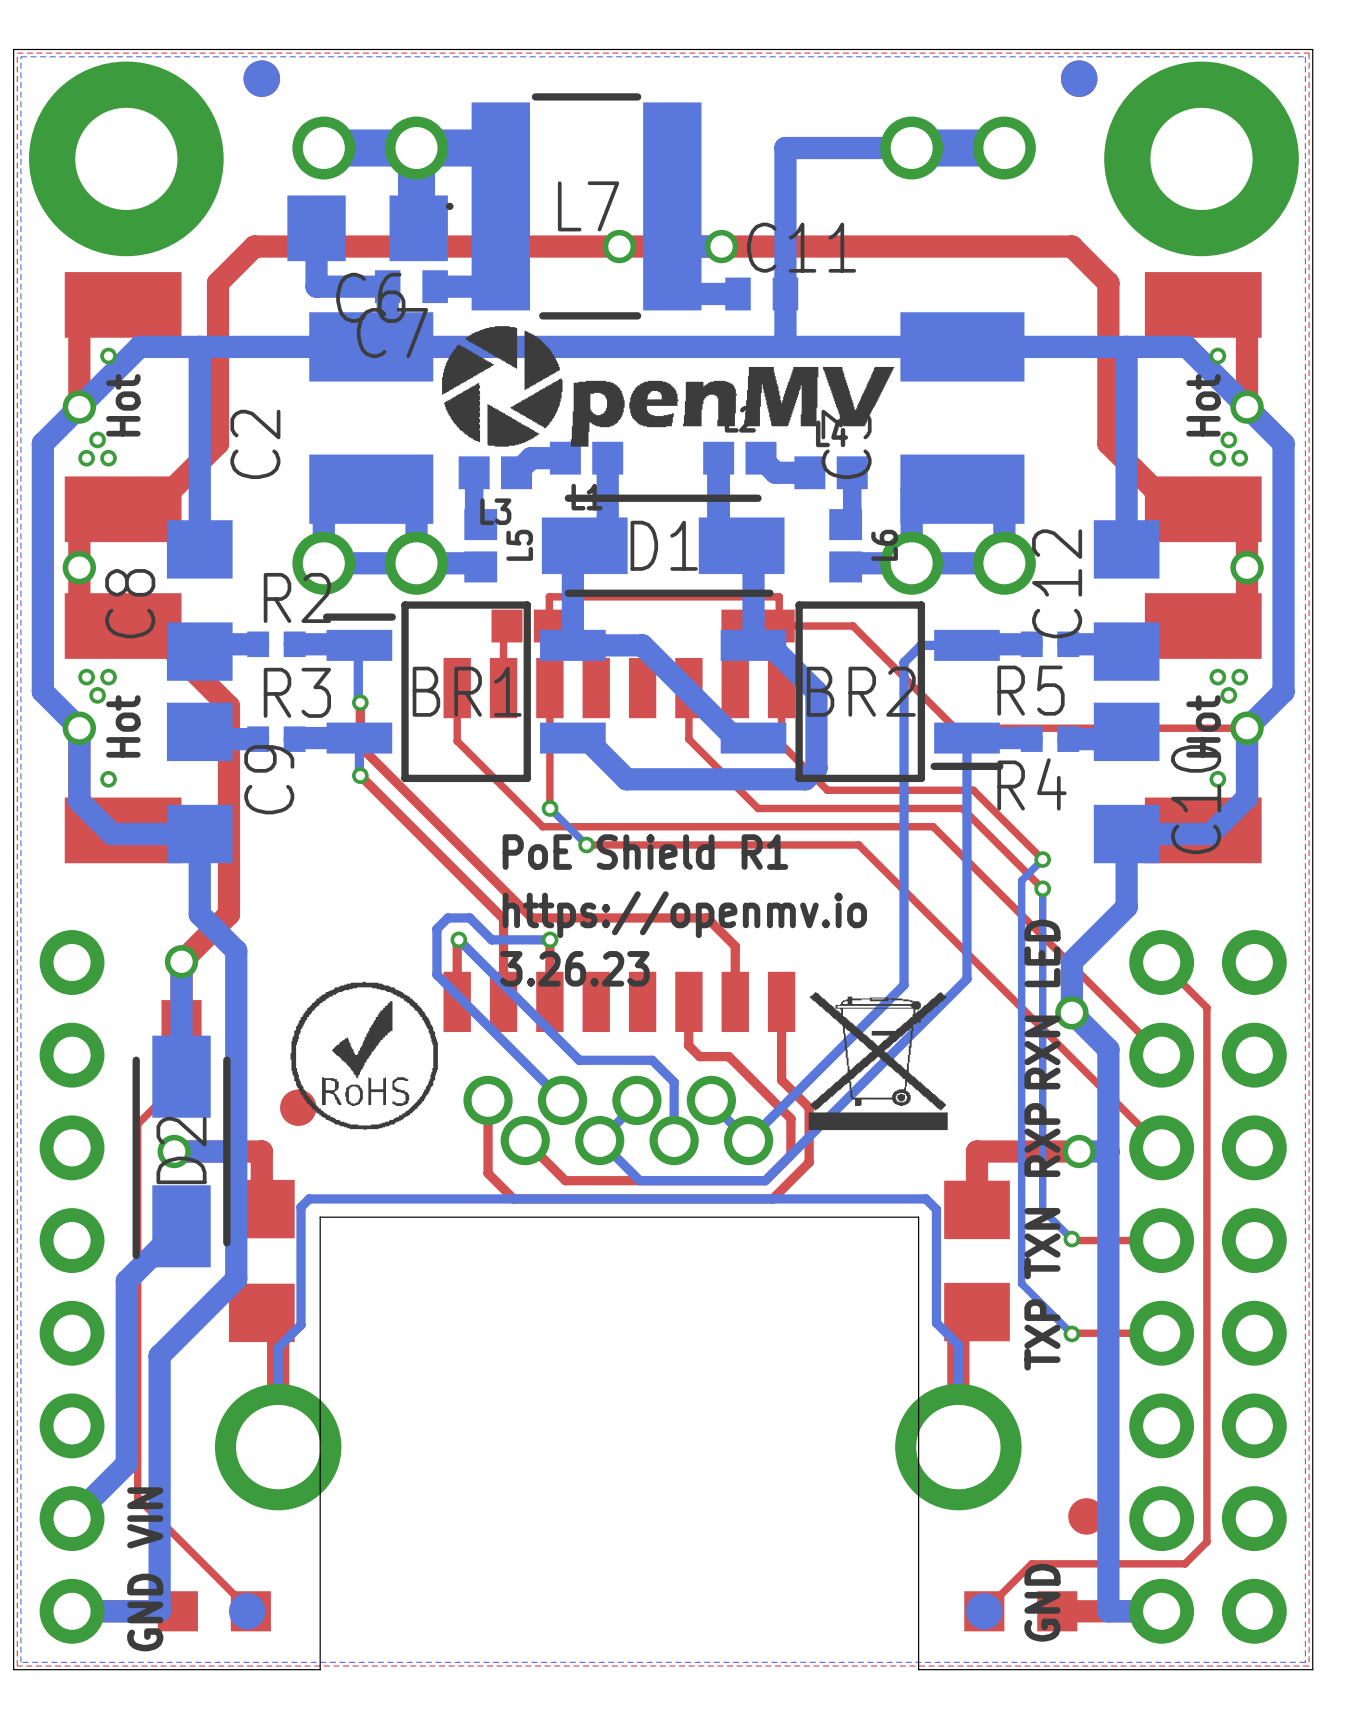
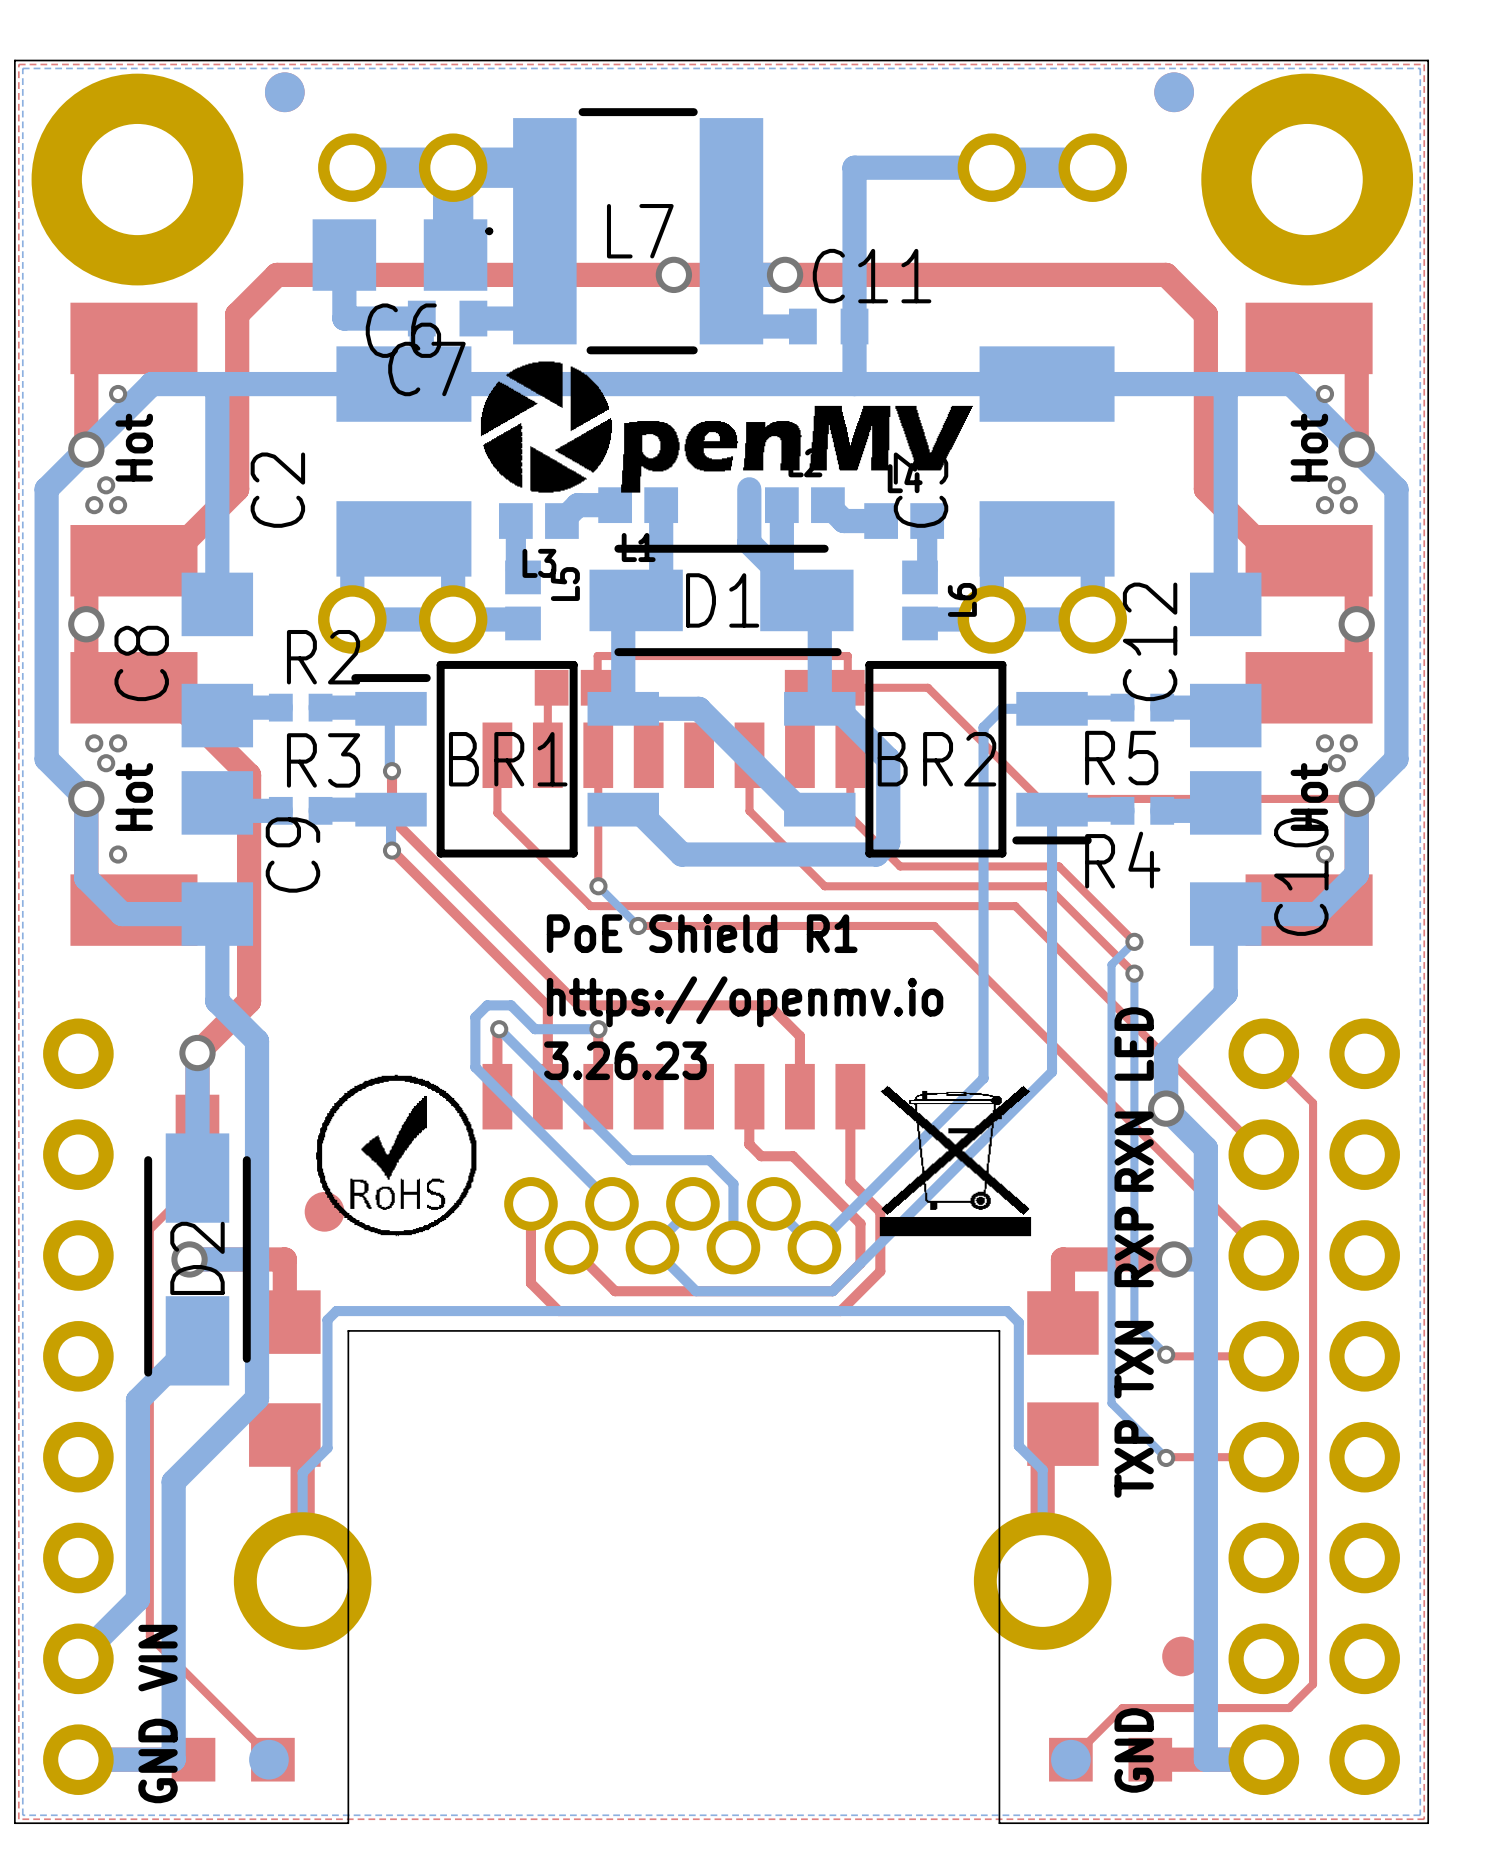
bottom track: none -> (749, 489) (749, 542) (781, 575)
L5 name position: L5 (519, 545) -> L5 (565, 584)

